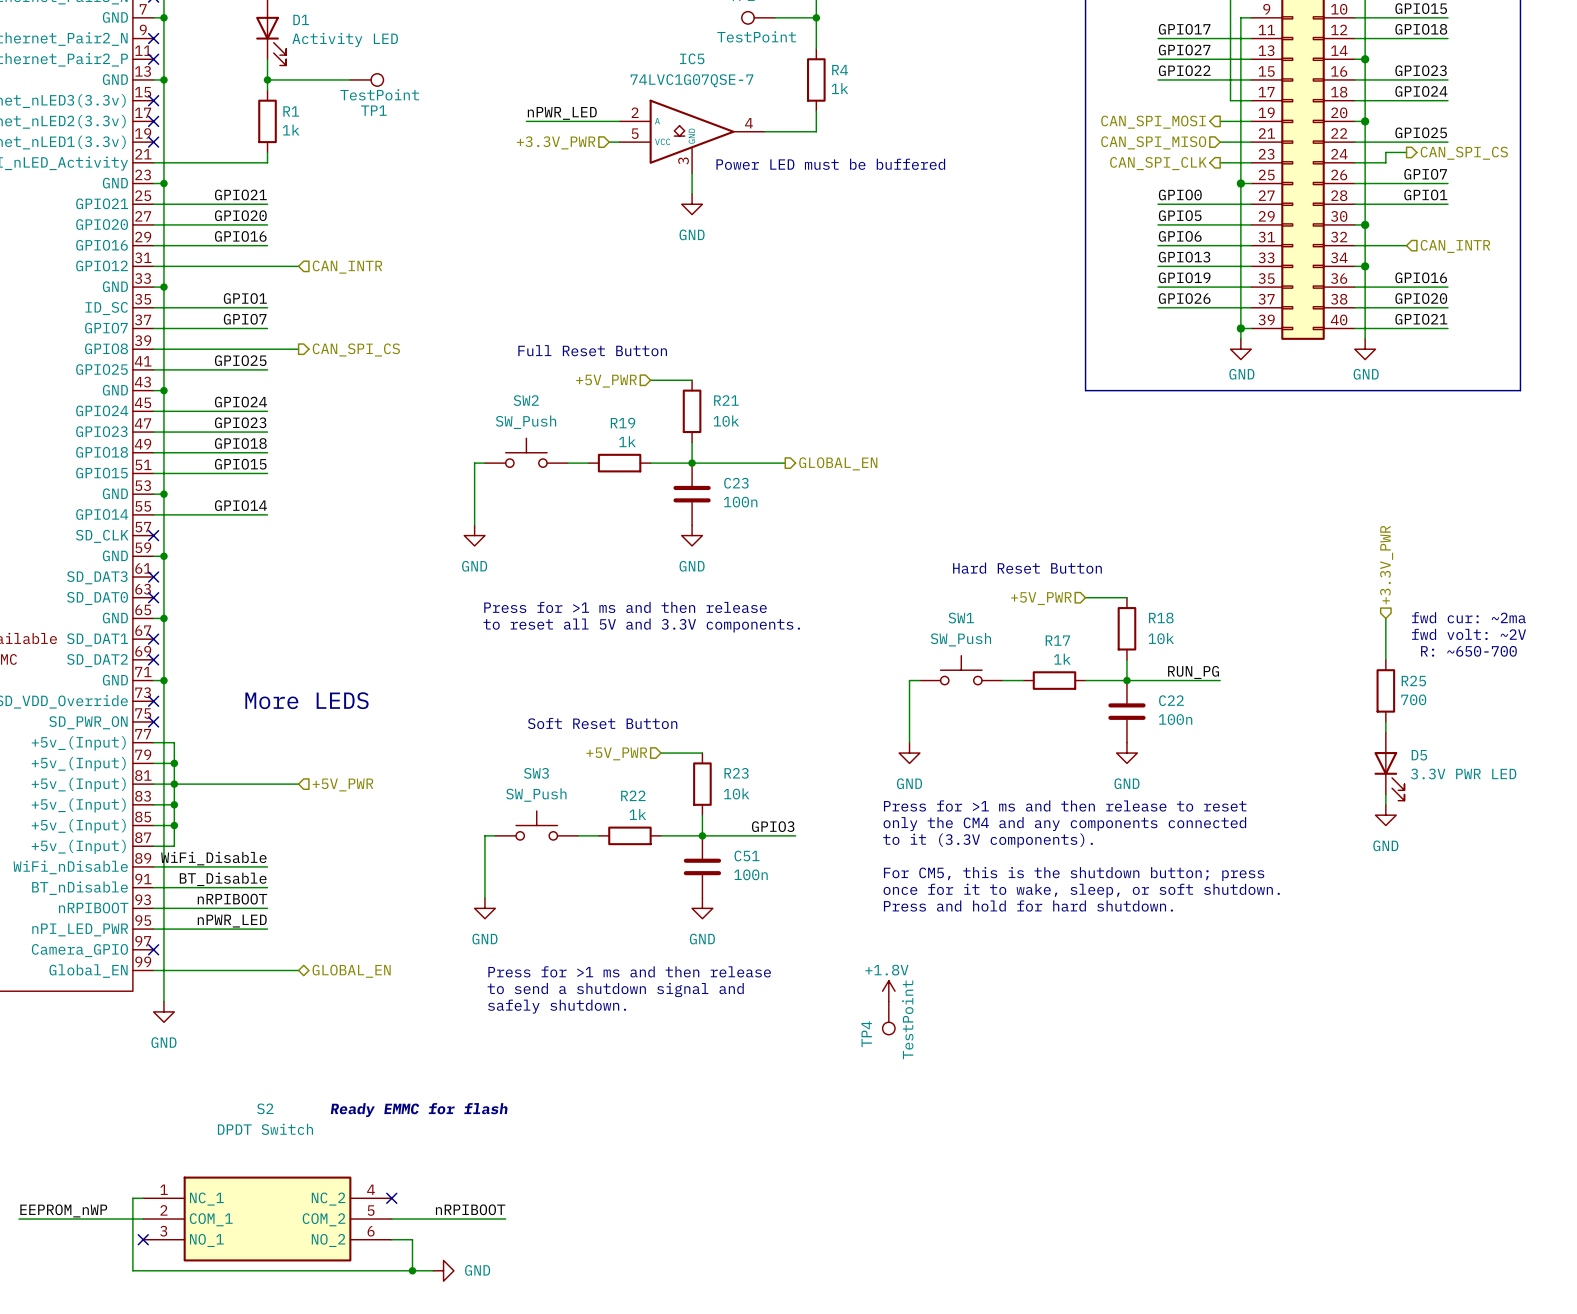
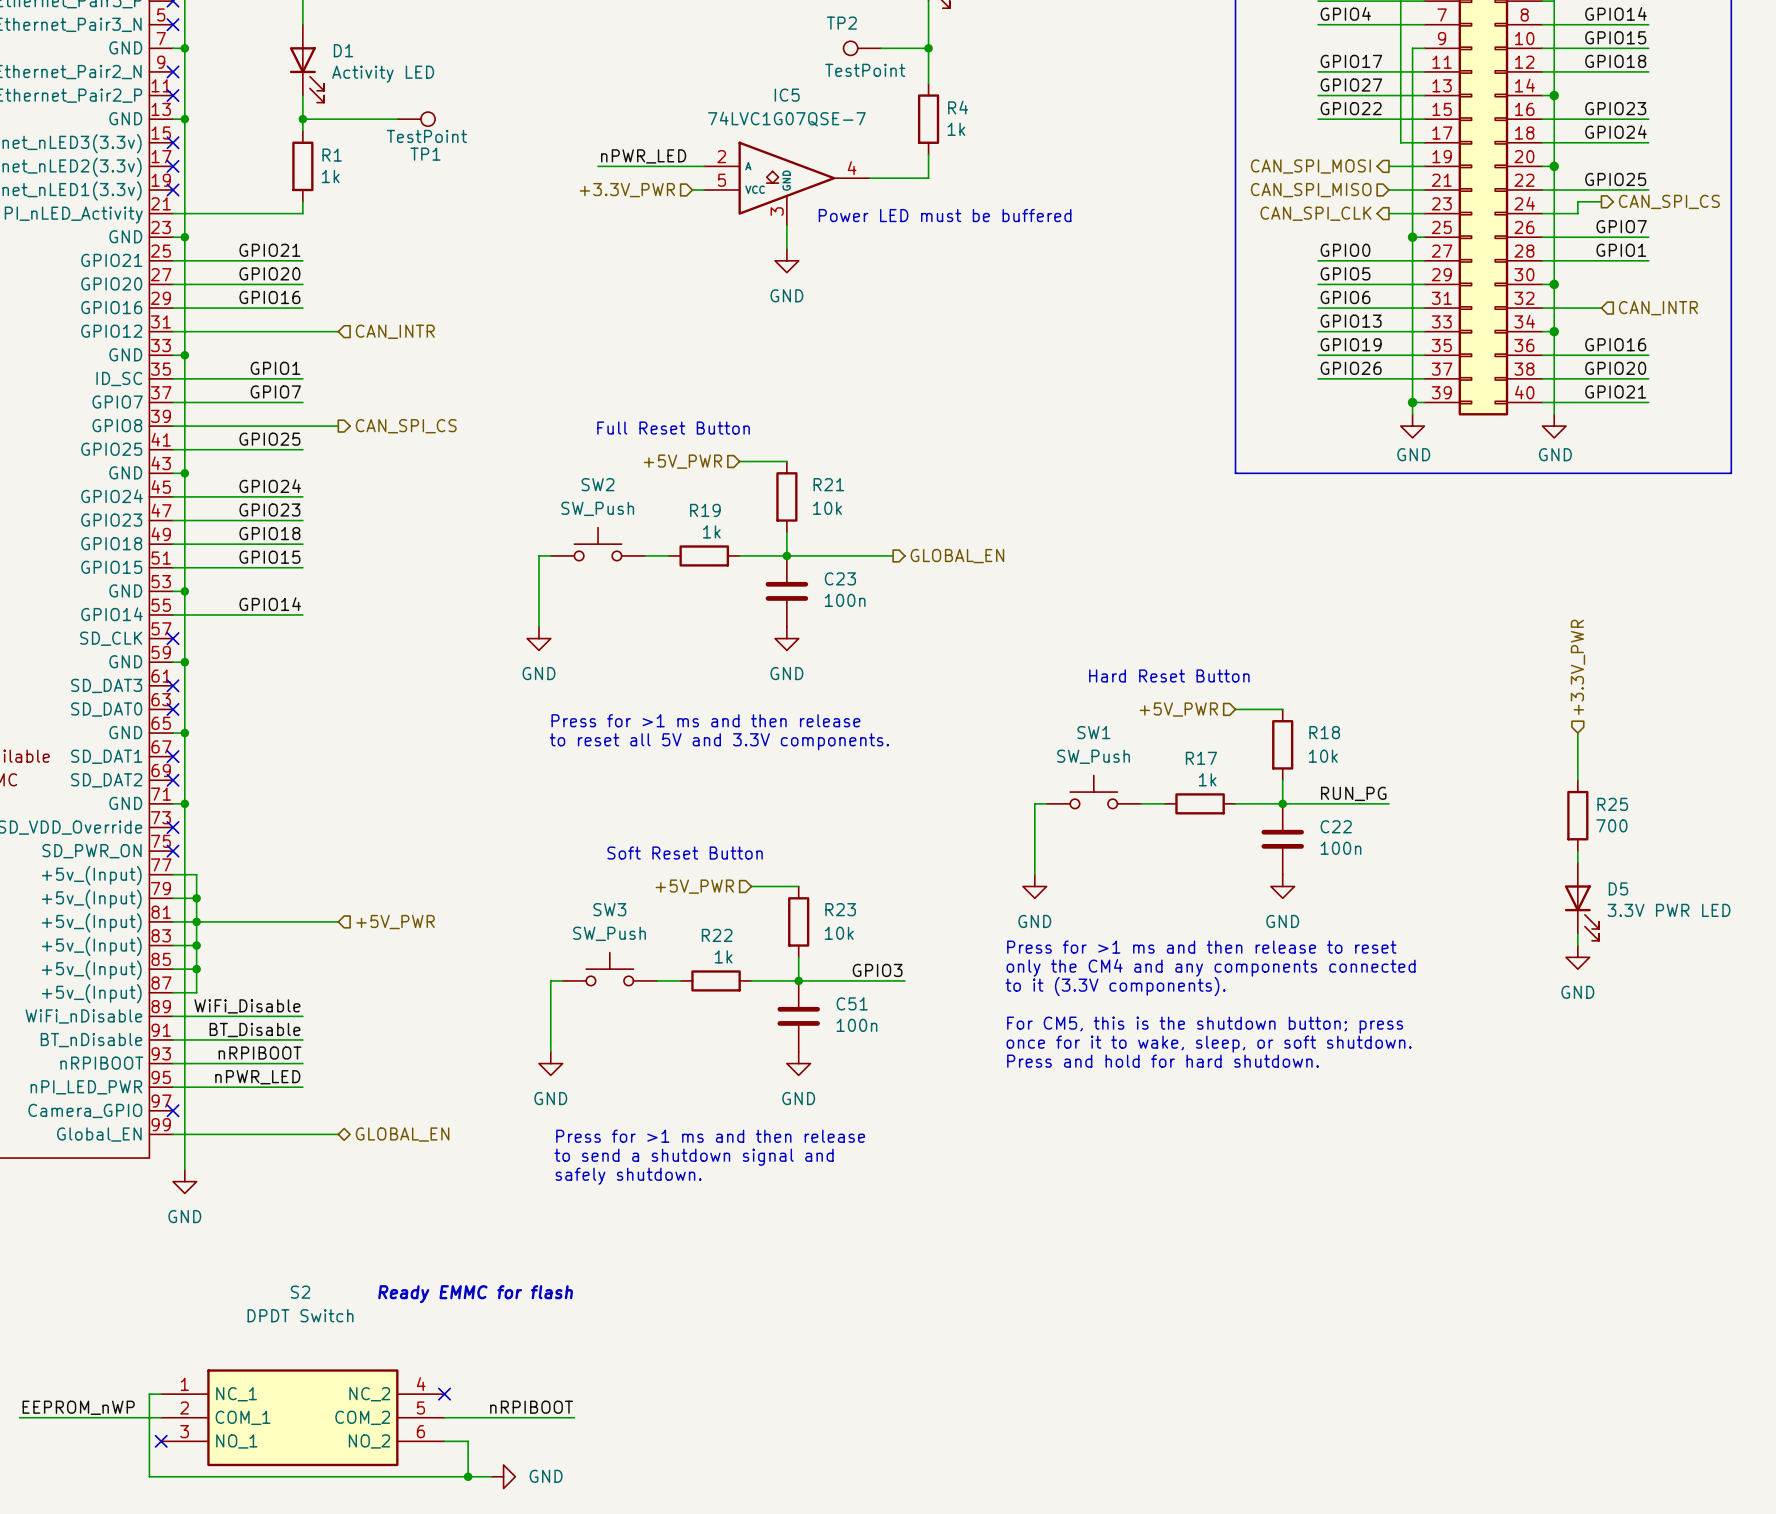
text: fwd cur: ~2ma (1468, 617) -> none
text: fwd volt: ~2V (1468, 634) -> none
text: R: ~650-700 (1468, 651) -> none
text: More LEDS (306, 700) -> none
power symbol: +1.8V (888, 991) -> none
TP4: TestPoint (888, 1018) -> none

